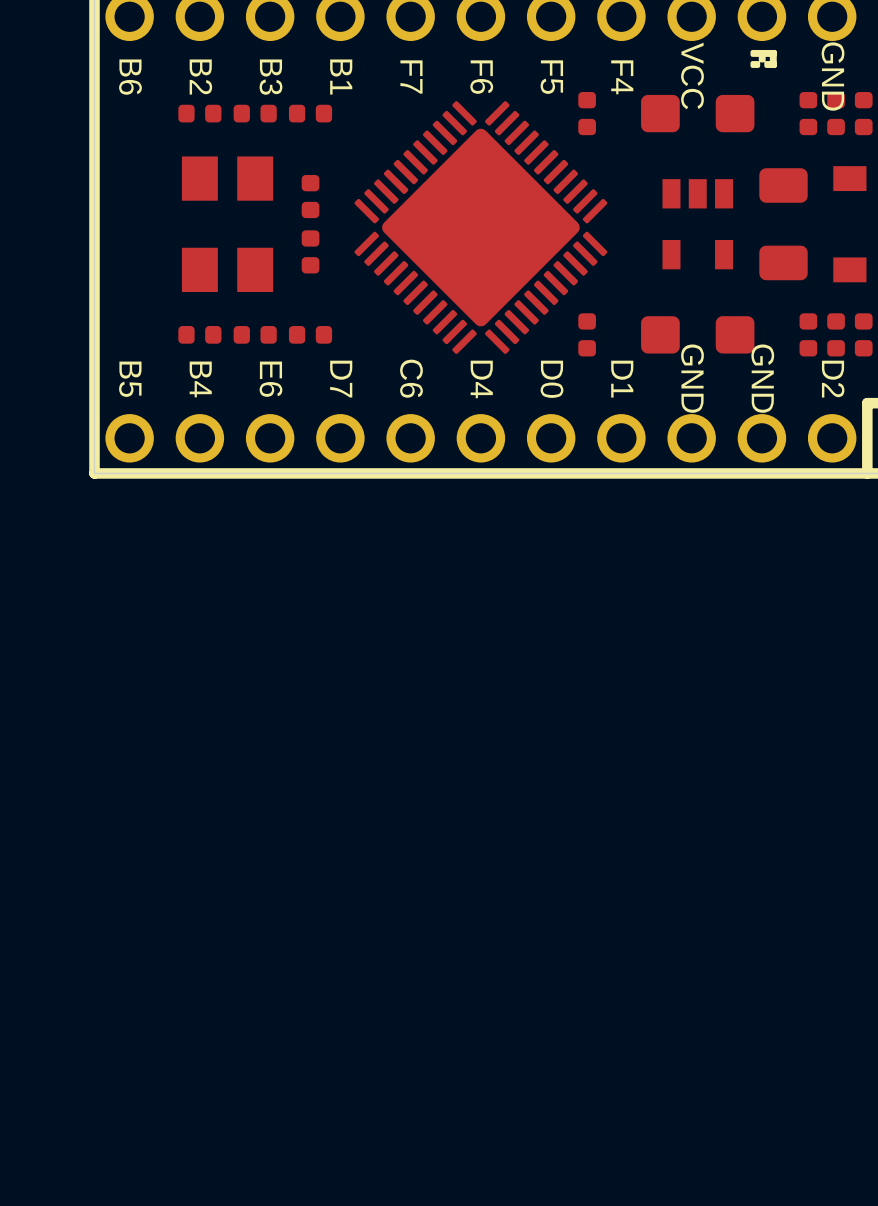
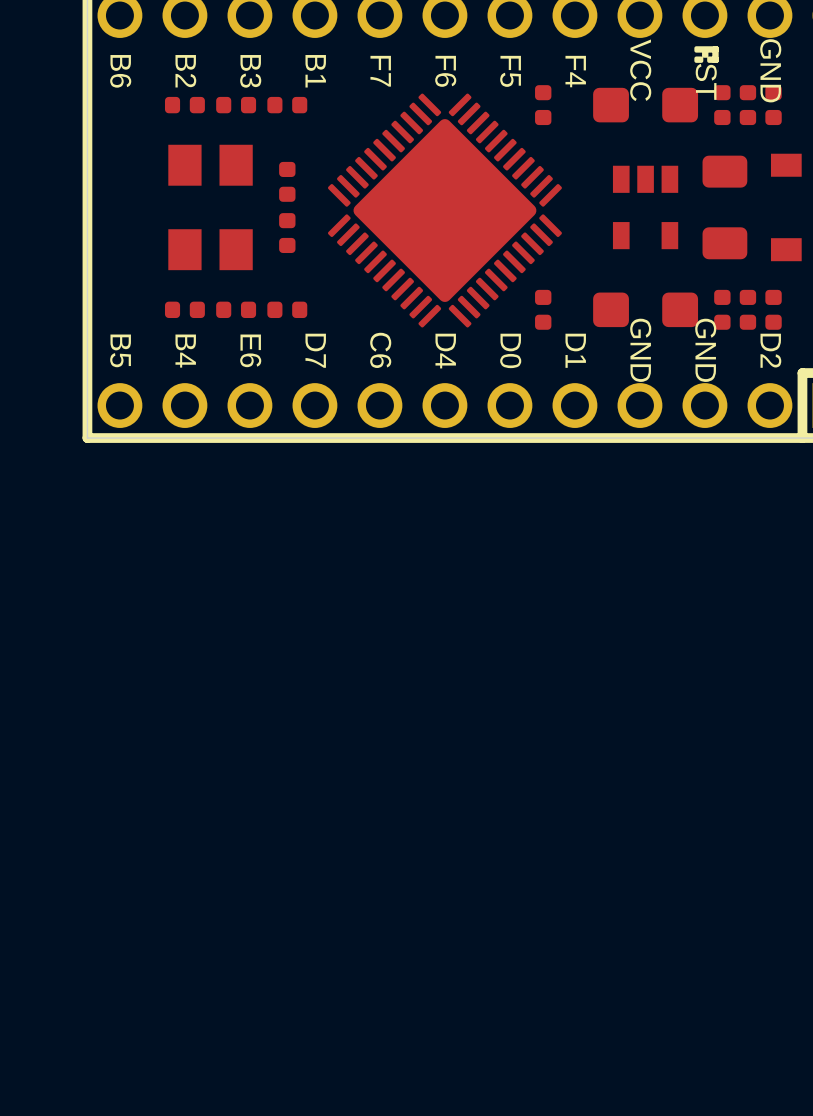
part text: none -> ST (706, 81)
part position: (863, 113) -> (722, 105)
part position: (863, 334) -> (722, 309)

